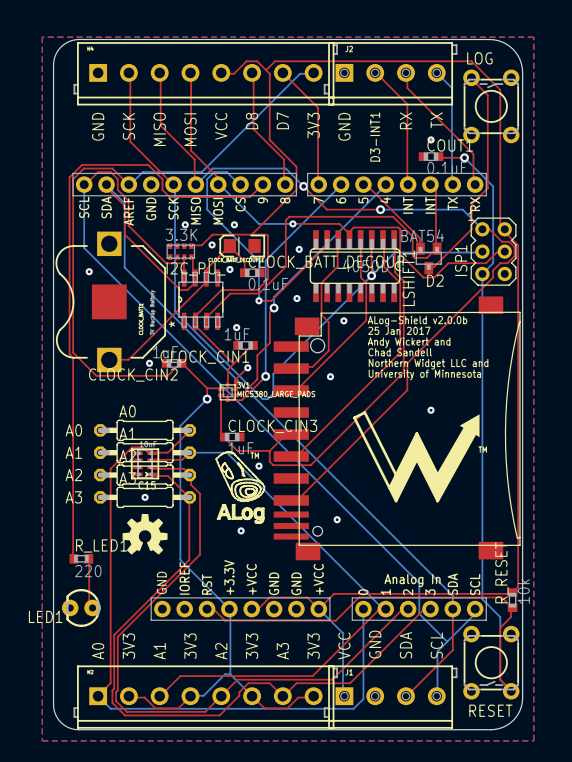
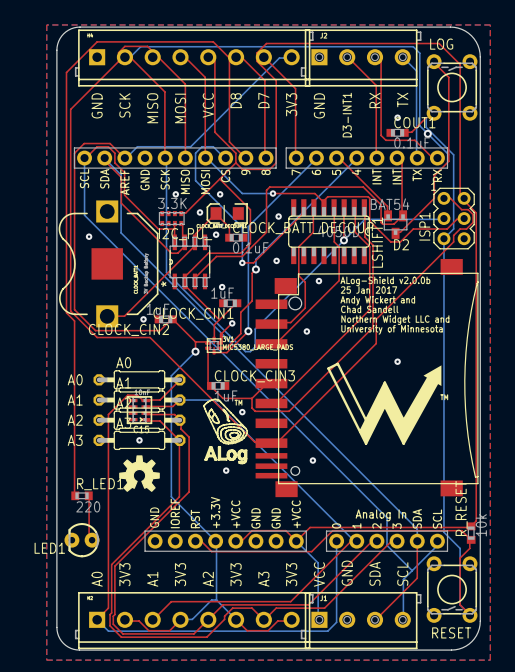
top track: (266, 70) (275, 61) (471, 61) (500, 89) -> (276, 141) (276, 80) (256, 61) (256, 53) (266, 43) (439, 43) (460, 64) (460, 72)
top track: (128, 72) (130, 141) (173, 184) -> (129, 57) (164, 91) (164, 158)
bottom track: none -> (129, 57) (140, 46) (413, 46) (419, 53) (419, 125) (427, 133)
top track: (159, 72) (160, 125) (194, 159) (195, 184) -> (271, 443) (254, 442) (150, 337) (97, 337) (70, 311) (70, 109) (118, 61) (118, 52) (124, 46) (147, 46) (185, 84) (185, 158)
top track: (190, 72) (191, 150) (217, 177) -> (185, 57) (205, 77) (205, 151)
top track: (221, 72) (233, 73) (246, 61) (257, 61) (269, 73) (269, 139) (296, 166) -> none
top track: none -> (213, 57) (214, 58) (214, 132) (235, 153) (235, 162)
top track: (252, 72) (253, 73) (253, 129) (284, 159) -> (241, 57) (264, 80) (264, 135)
top track: (405, 72) (407, 88) (473, 154) (473, 184) -> (380, 57) (381, 135) (385, 140) (414, 140) (432, 158) (435, 158)
top track: (438, 156) (464, 157) -> (404, 132) (411, 132) (426, 117)
bottom track: (487, 181) (493, 186) -> (426, 117) (426, 127) (453, 154) (453, 159)
bottom track: (195, 184) (212, 168) (285, 168) (303, 186) -> none
top track: (262, 184) (250, 197) (169, 197) (162, 189) (162, 179) (148, 164) (82, 164) (69, 177) (69, 354) (73, 357) (73, 365) -> (245, 158) (229, 141) (229, 58) (213, 41) (97, 41) (66, 72) (66, 312) (74, 320)
top track: (303, 186) (326, 209) (380, 209) -> none
via: (303, 186) -> none
top track: none -> (235, 162) (185, 212)
top track: (289, 197) (251, 234) -> (269, 169) (242, 169) (235, 162)
bottom track: (380, 209) (462, 209) (482, 229) -> none
via: (380, 209) -> none
top track: (267, 241) (266, 234) (212, 234) (201, 245) (196, 245) -> (250, 209) (219, 179)

